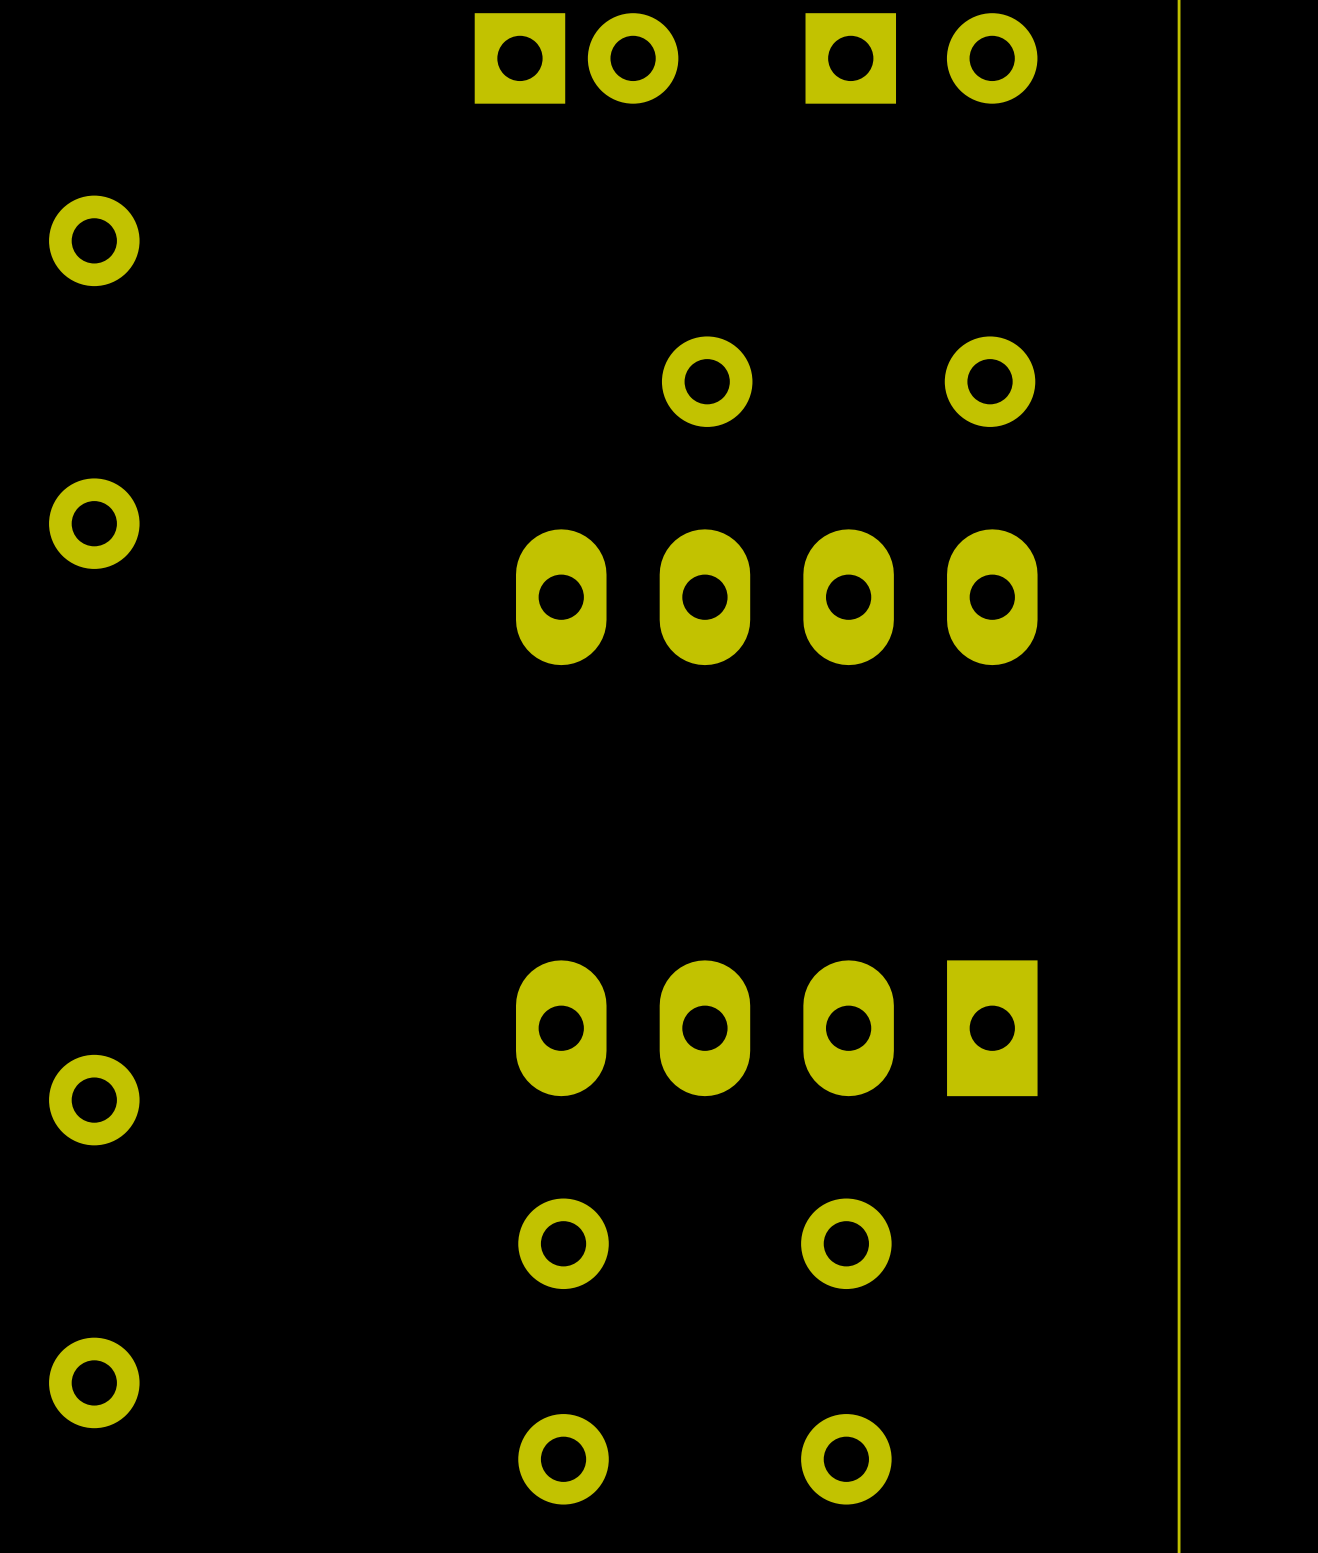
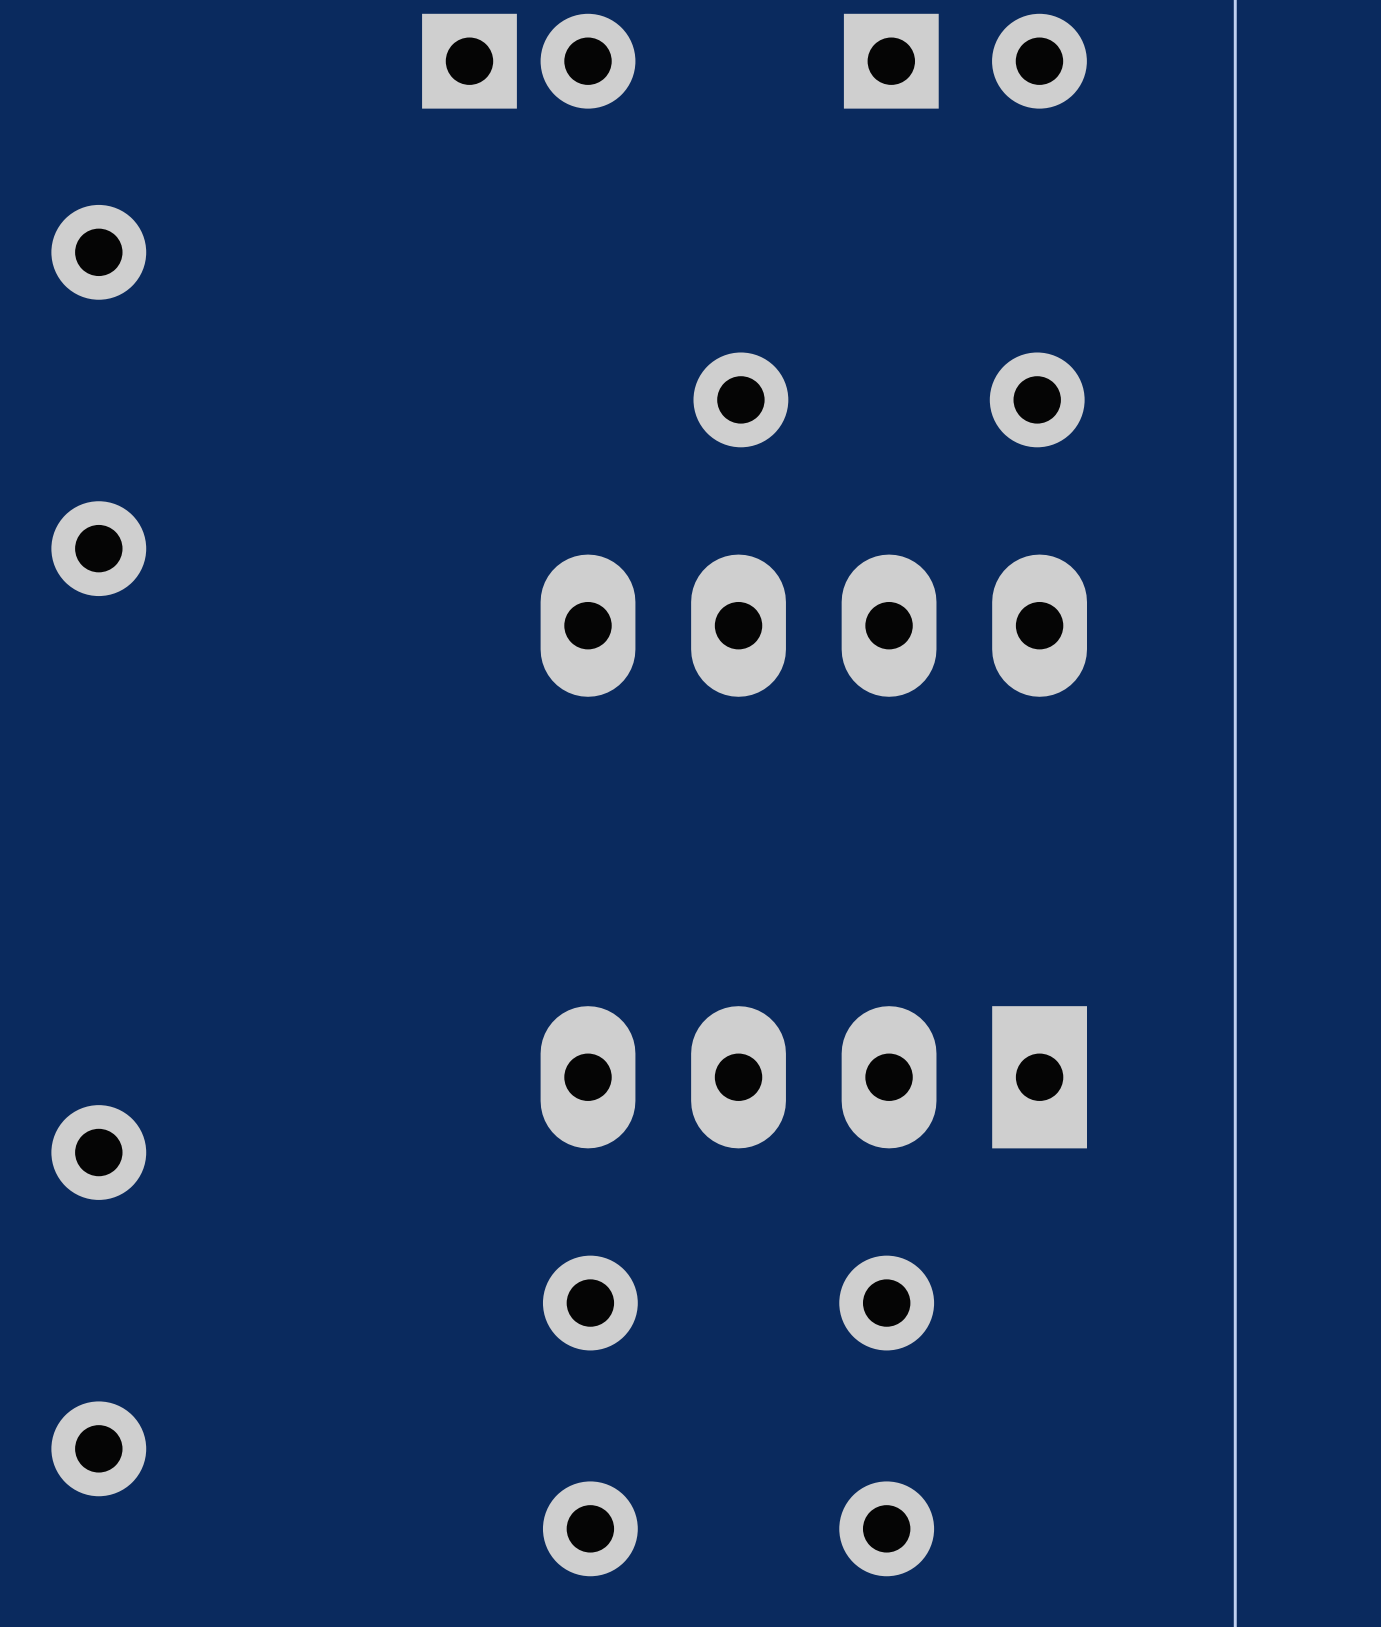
part position: (576, 58) -> (528, 61)

